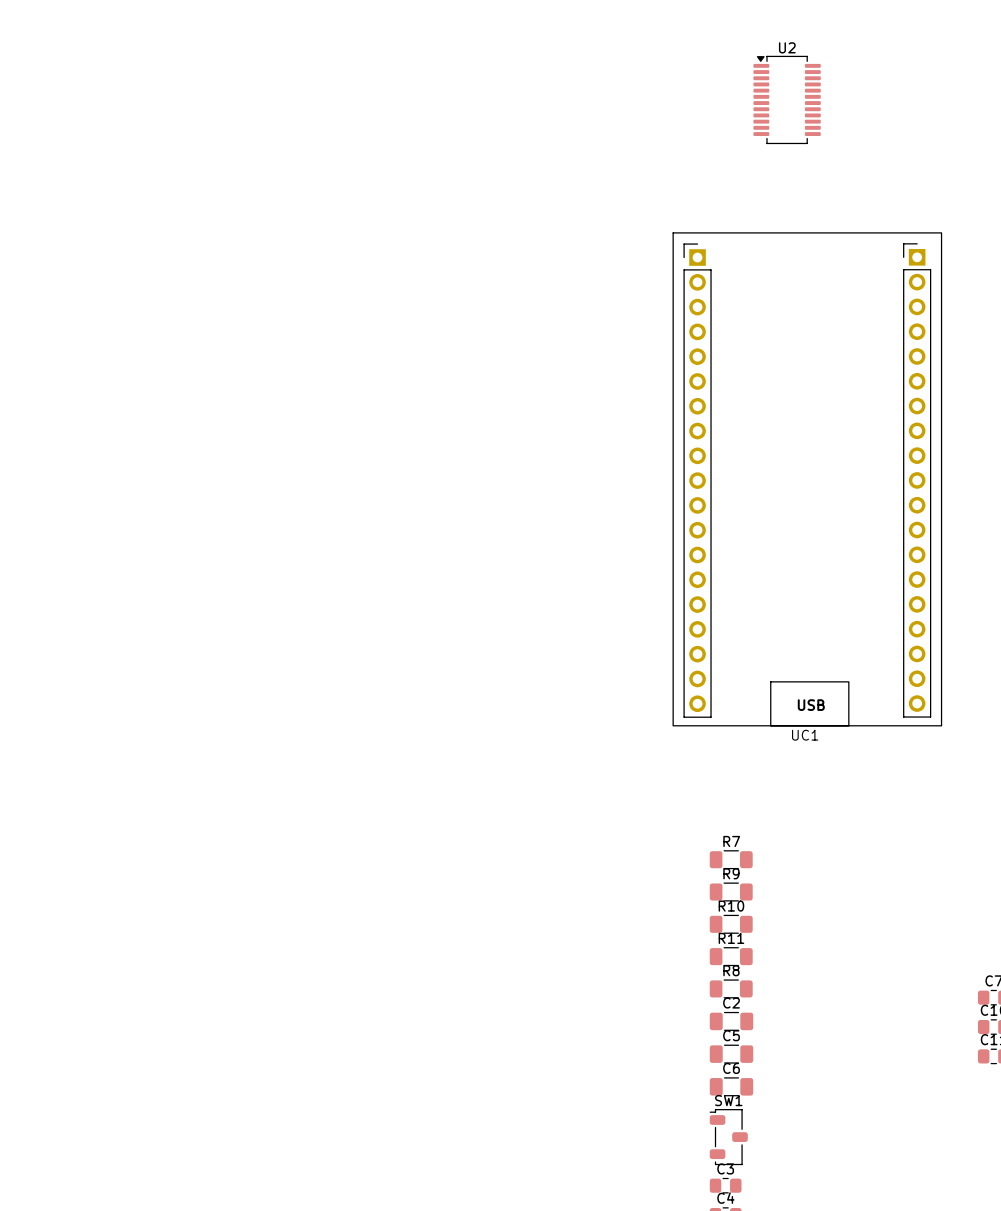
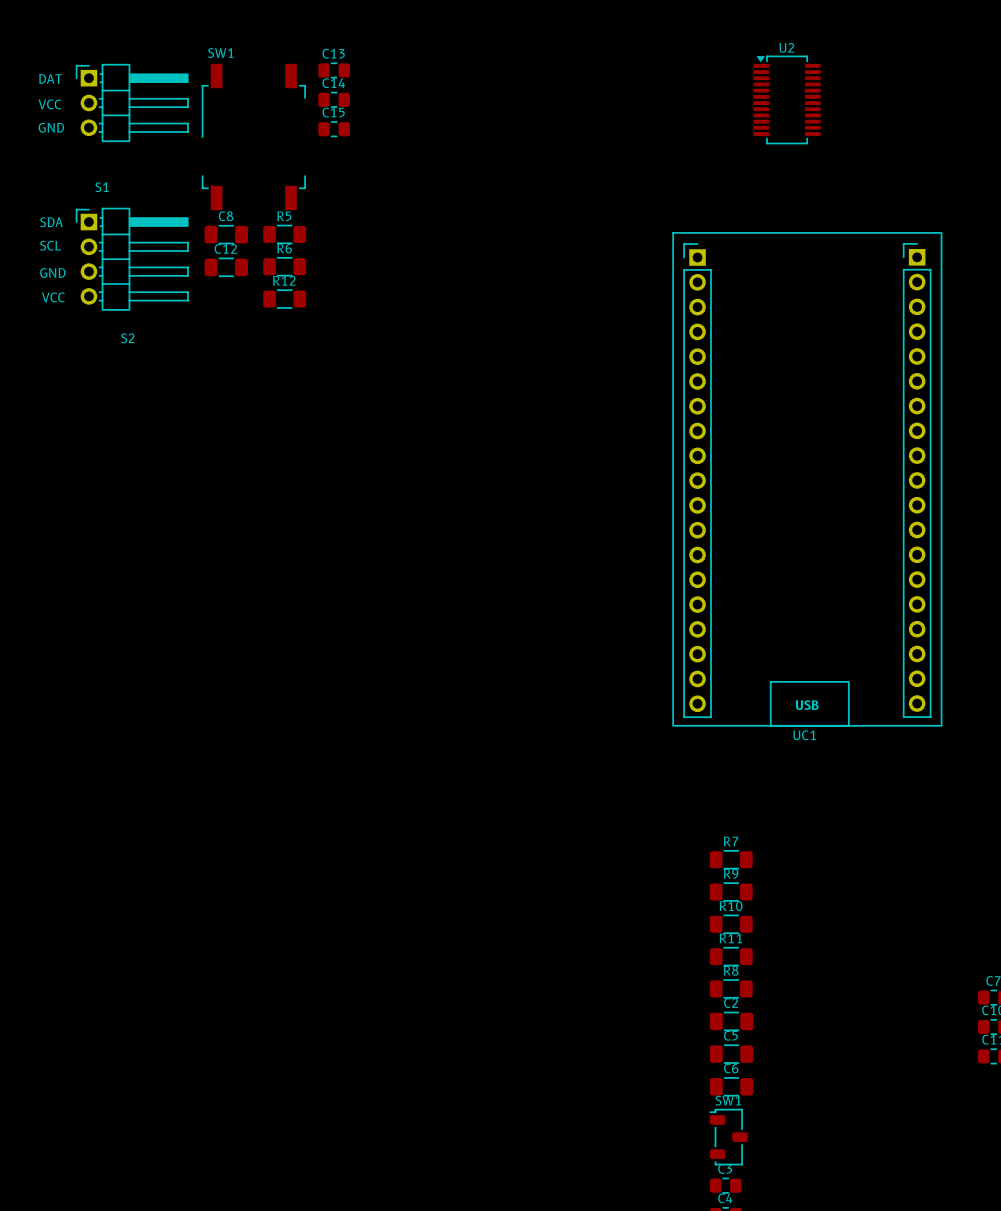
C13: none -> (334, 70)
C14: none -> (334, 99)
S1: none -> (132, 102)
C15: none -> (334, 129)
SW1: none -> (253, 137)
C8: none -> (226, 234)
R5: none -> (284, 234)
S2: none -> (132, 259)
R6: none -> (284, 266)
C12: none -> (226, 267)
R12: none -> (284, 299)

